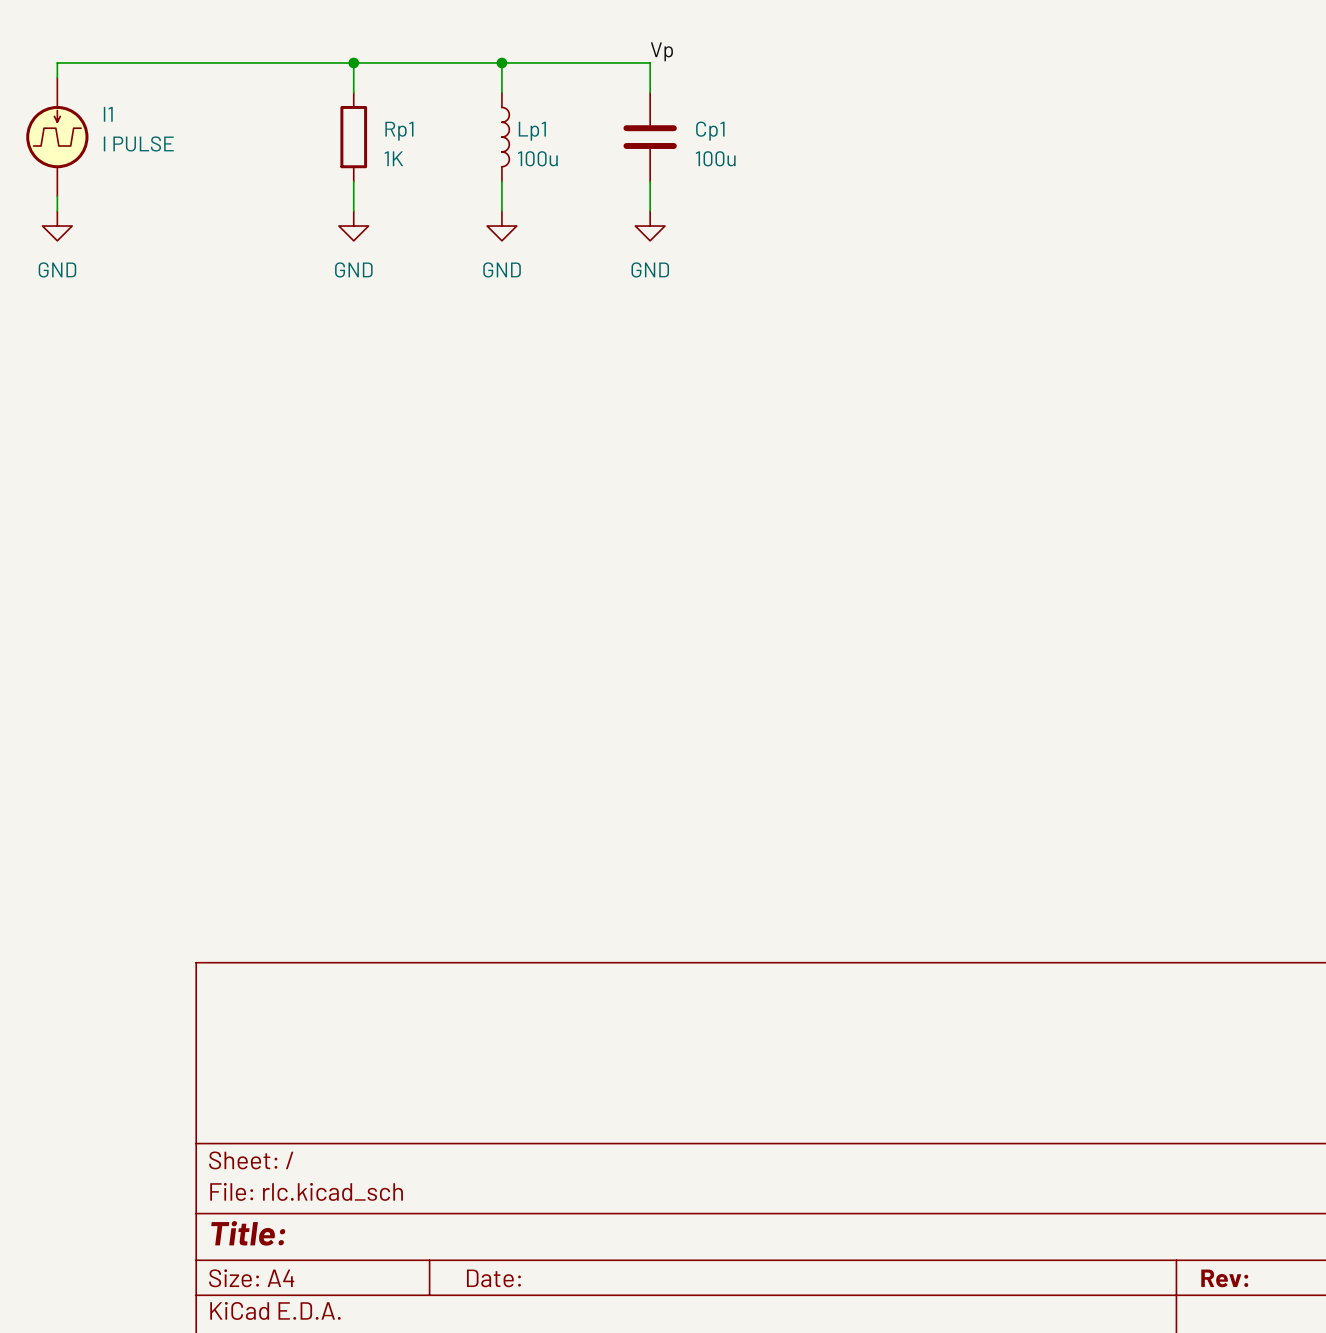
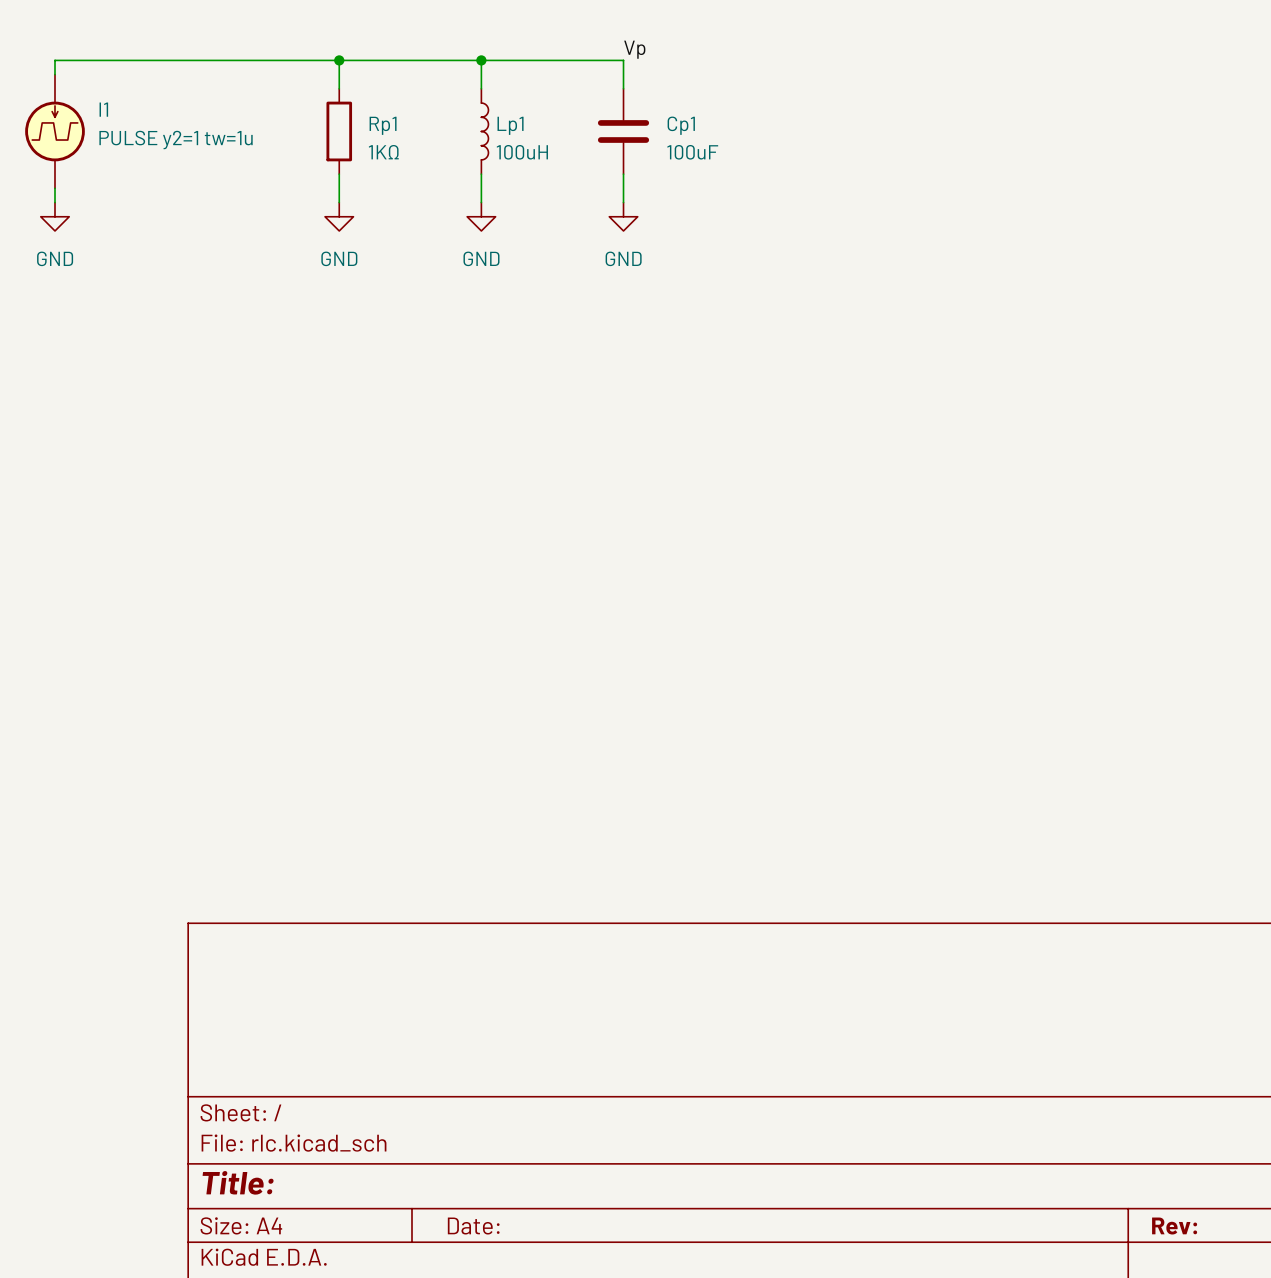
I1 value: I PULSE (138, 143) -> PULSE y2=1 tw=1u (176, 140)
Rp1 value: 1K (393, 158) -> 1KΩ (383, 152)
Lp1 value: 100u (537, 158) -> 100uH (522, 152)
Cp1 value: 100u (715, 158) -> 100uF (692, 152)

